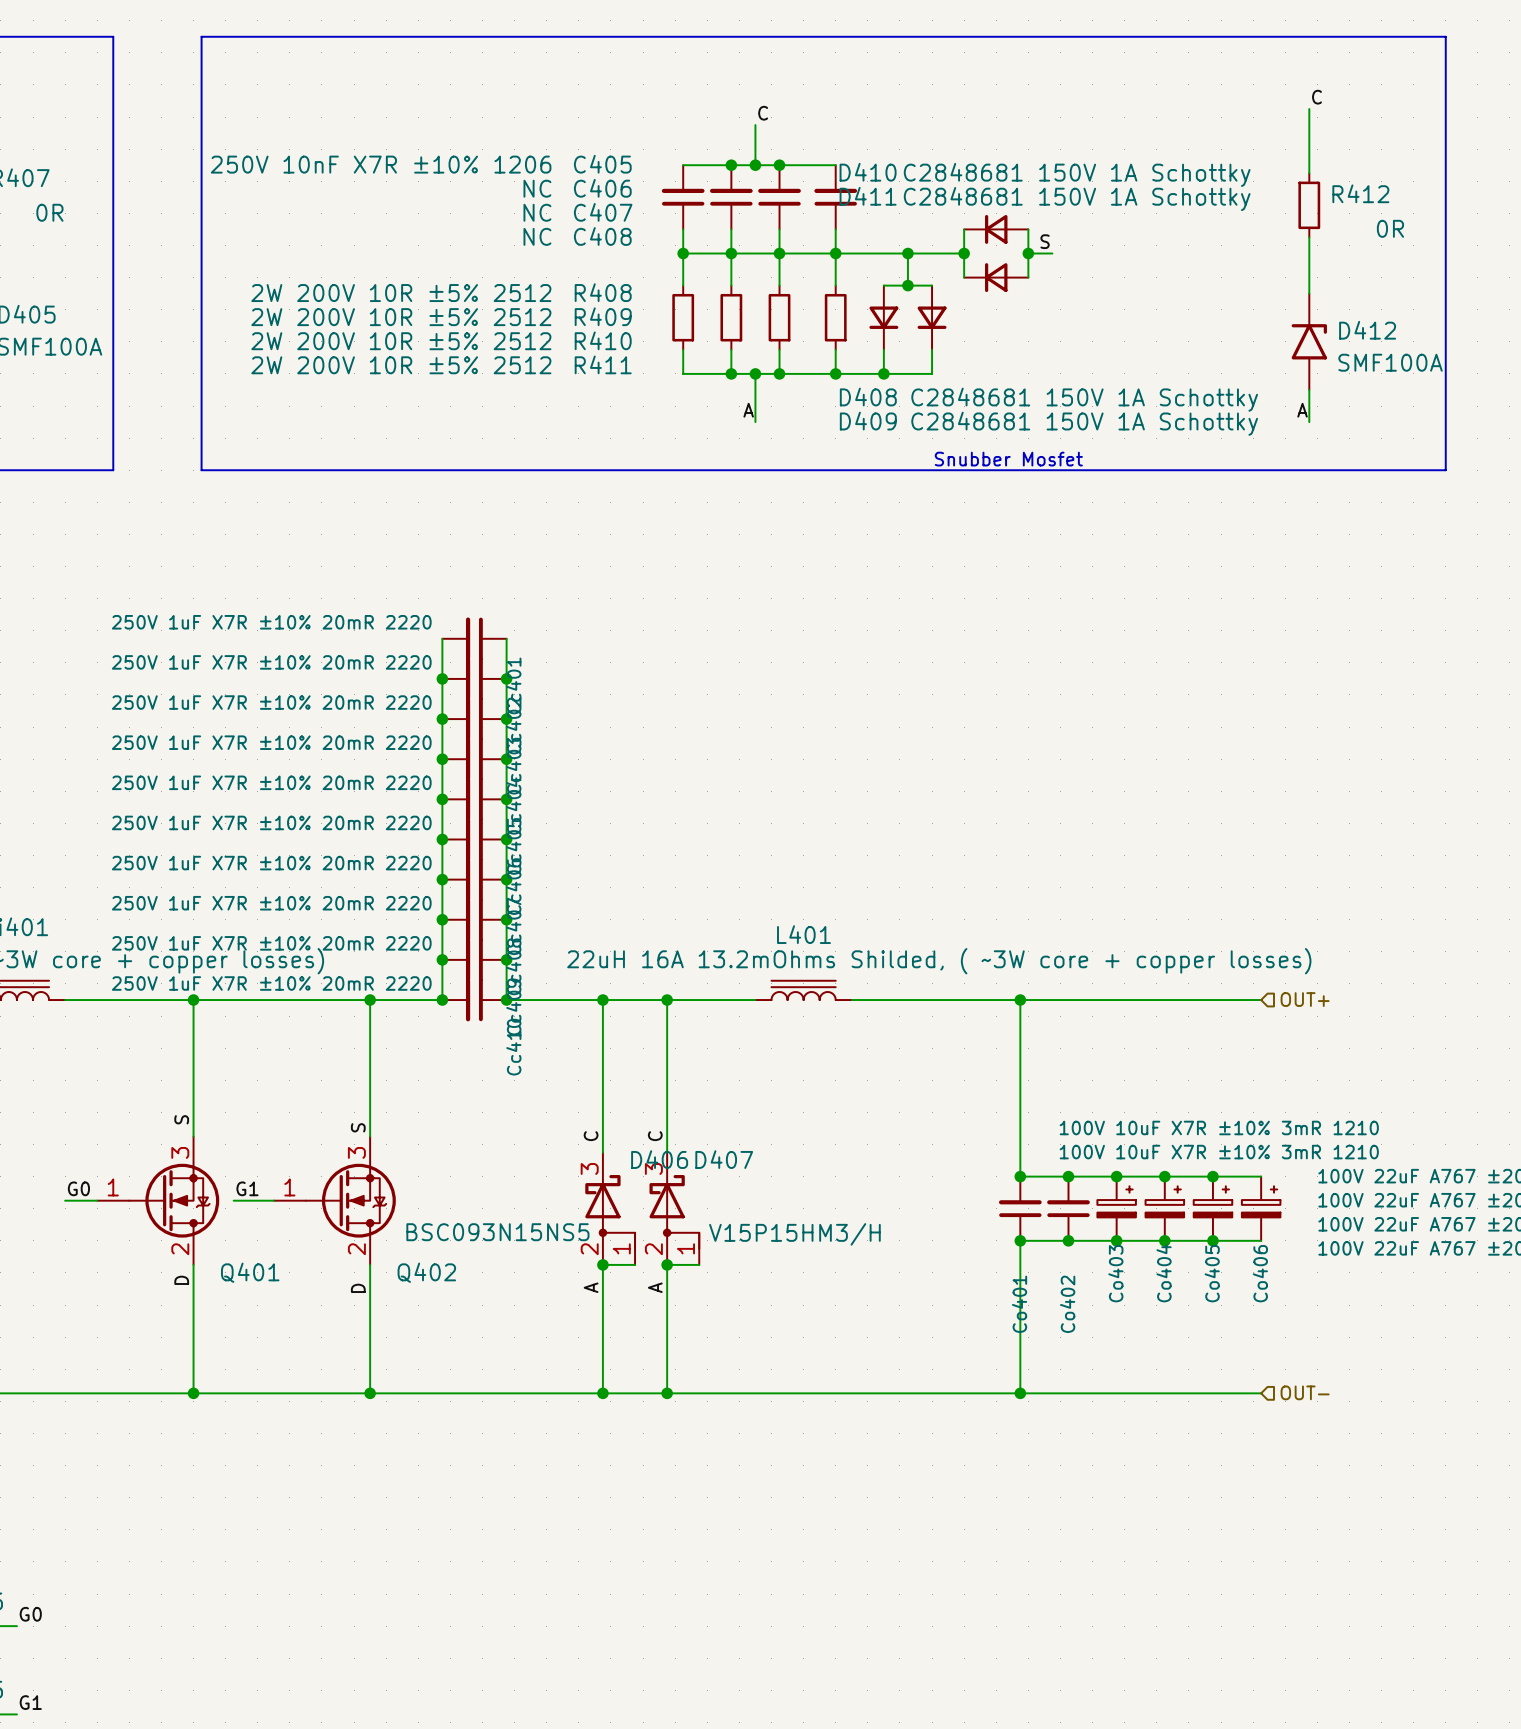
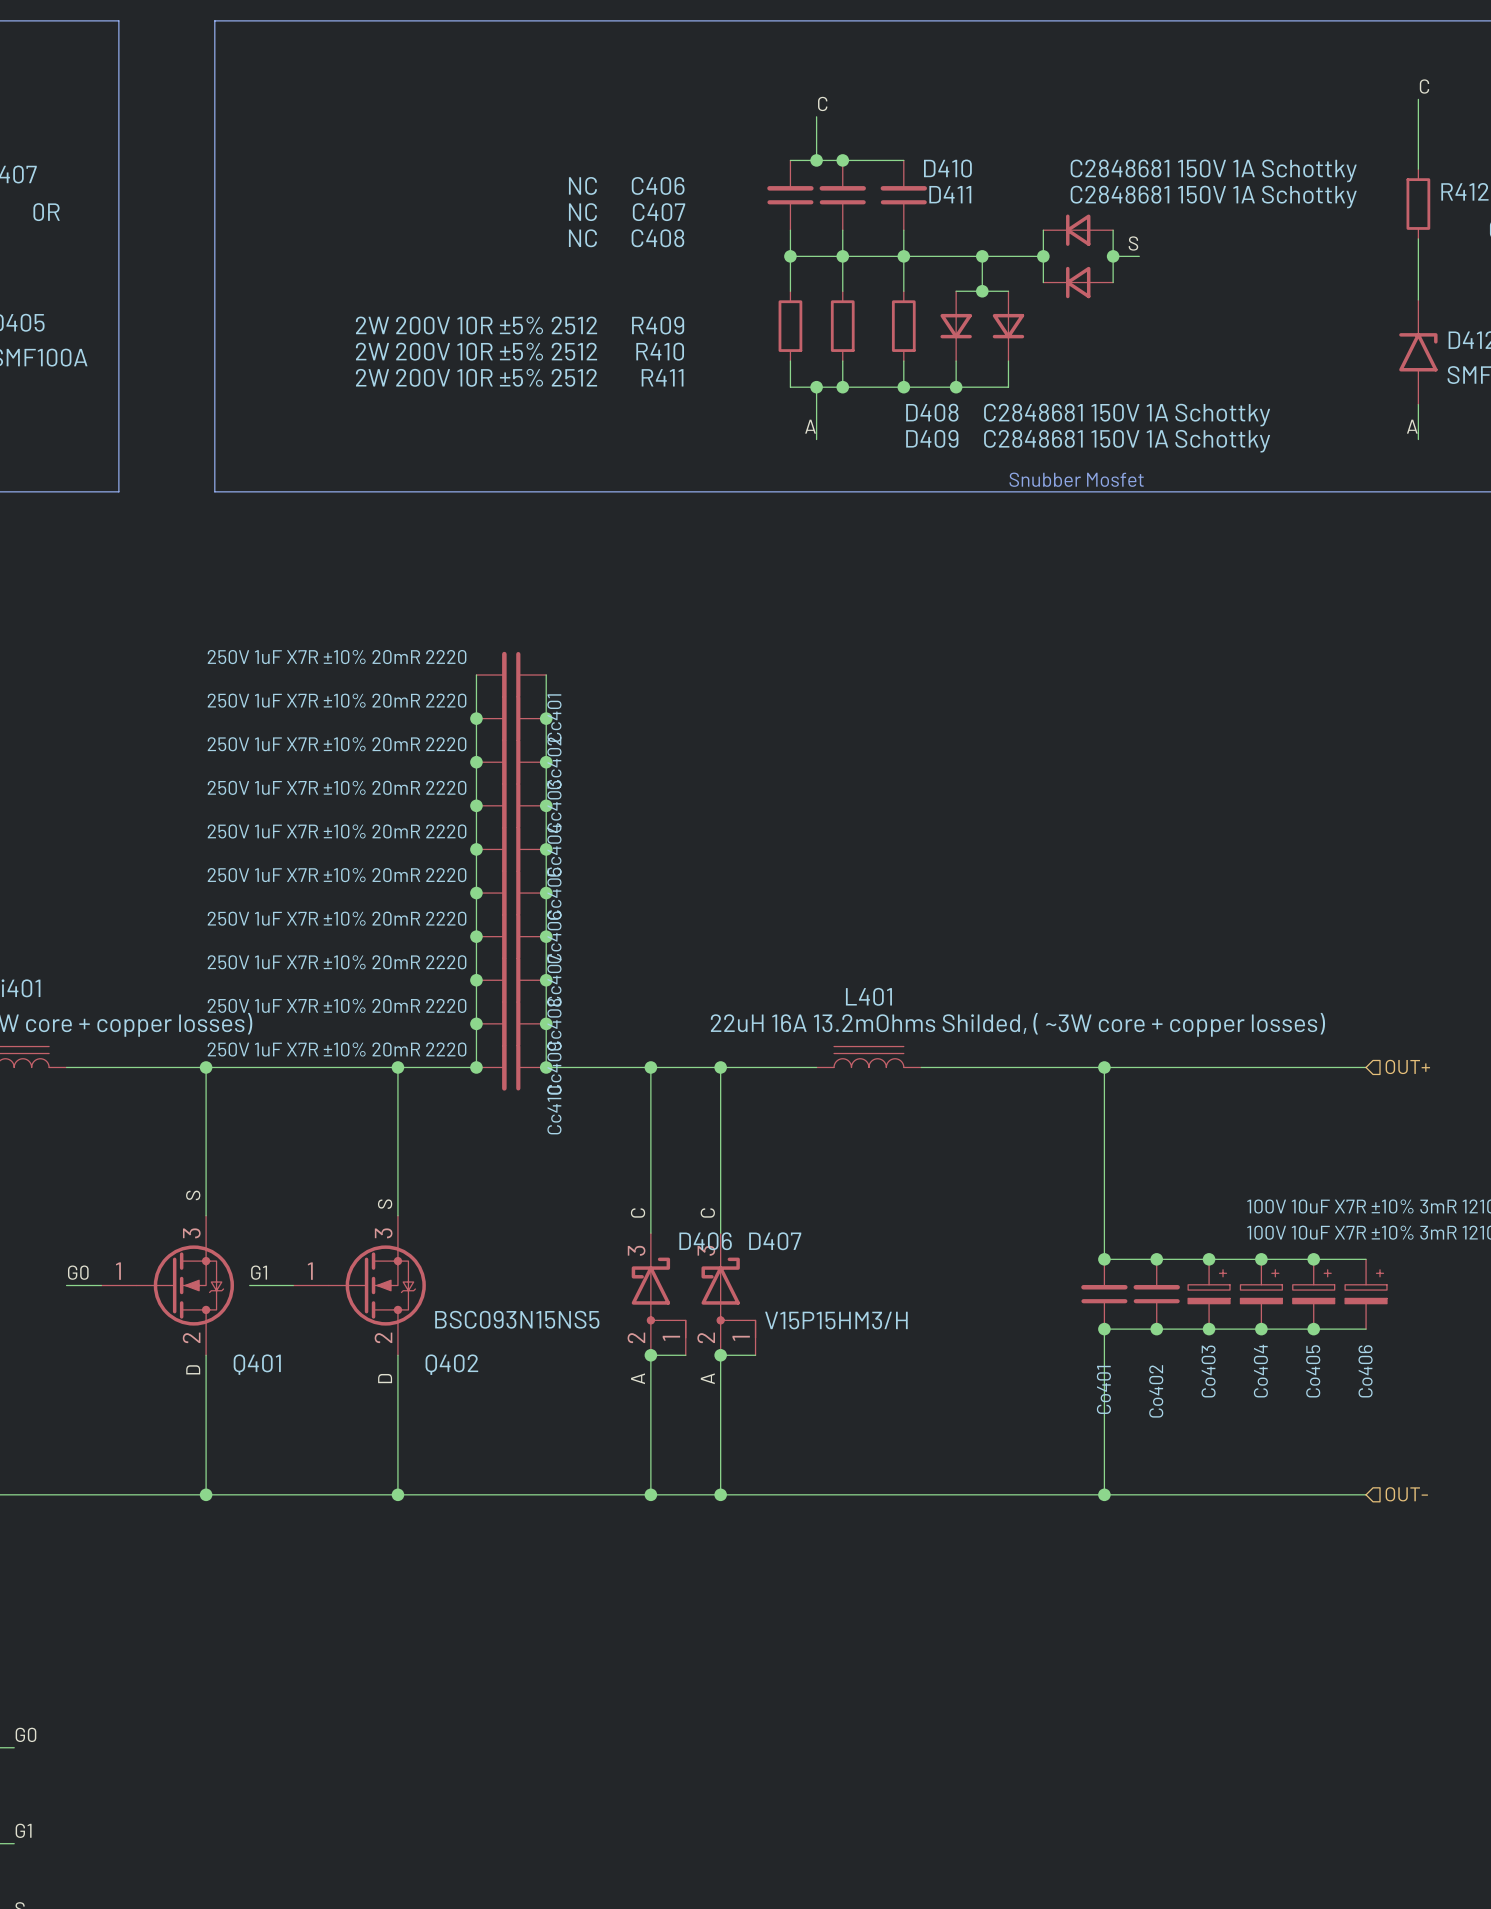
wire: (683, 165) (731, 165) -> none
junction: (731, 165) -> none
C405: 250V 10nF X7R ±10% 1206 (683, 197) -> none
wire: (683, 229) (683, 285) -> none
wire: (683, 253) (731, 253) -> none
junction: (683, 253) -> none
R408: 2W 200V 10R ±5% 2512 (683, 317) -> none
wire: (683, 349) (683, 373) (731, 373) -> none
junction: (731, 373) -> none

